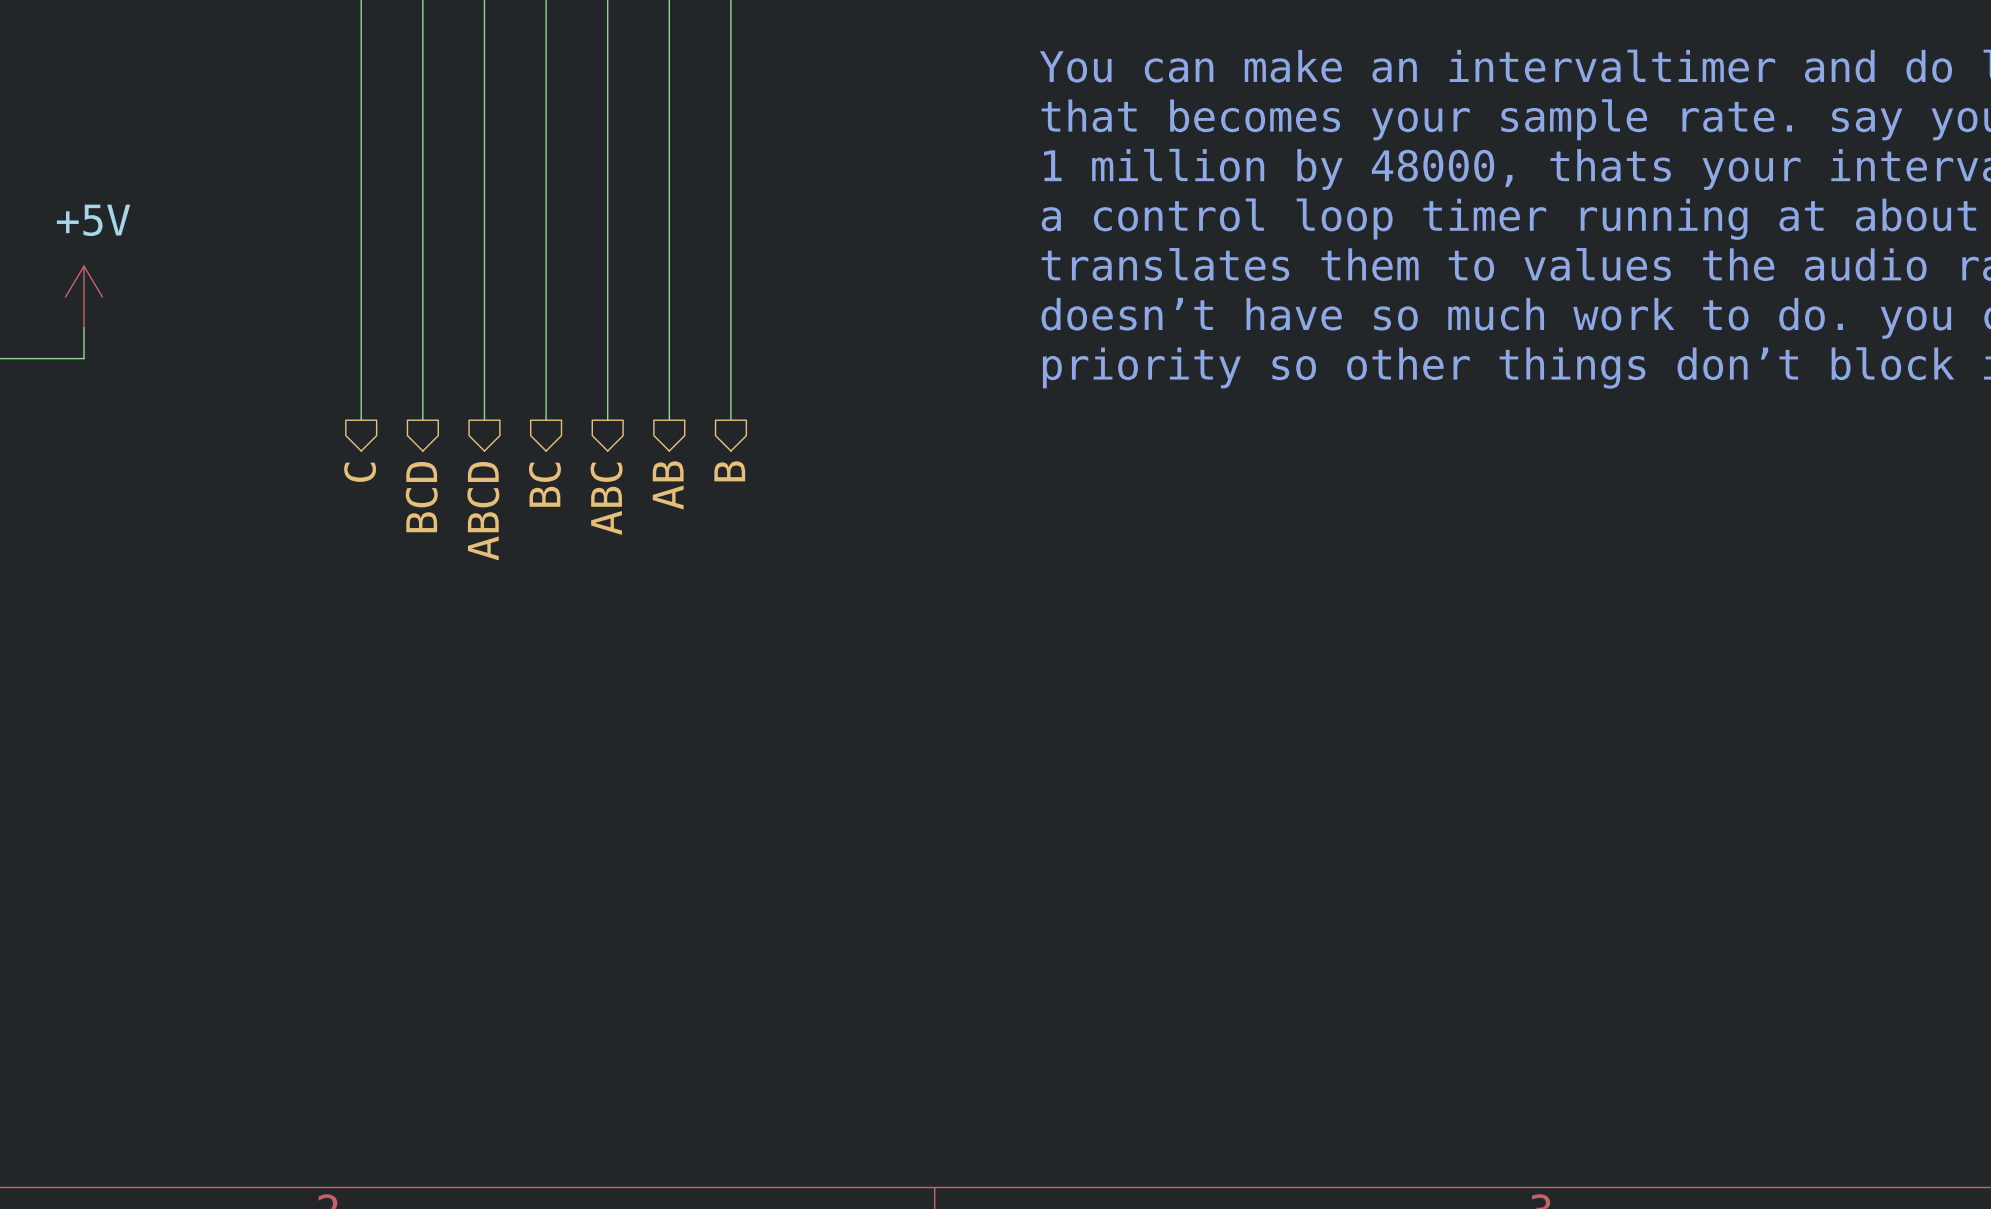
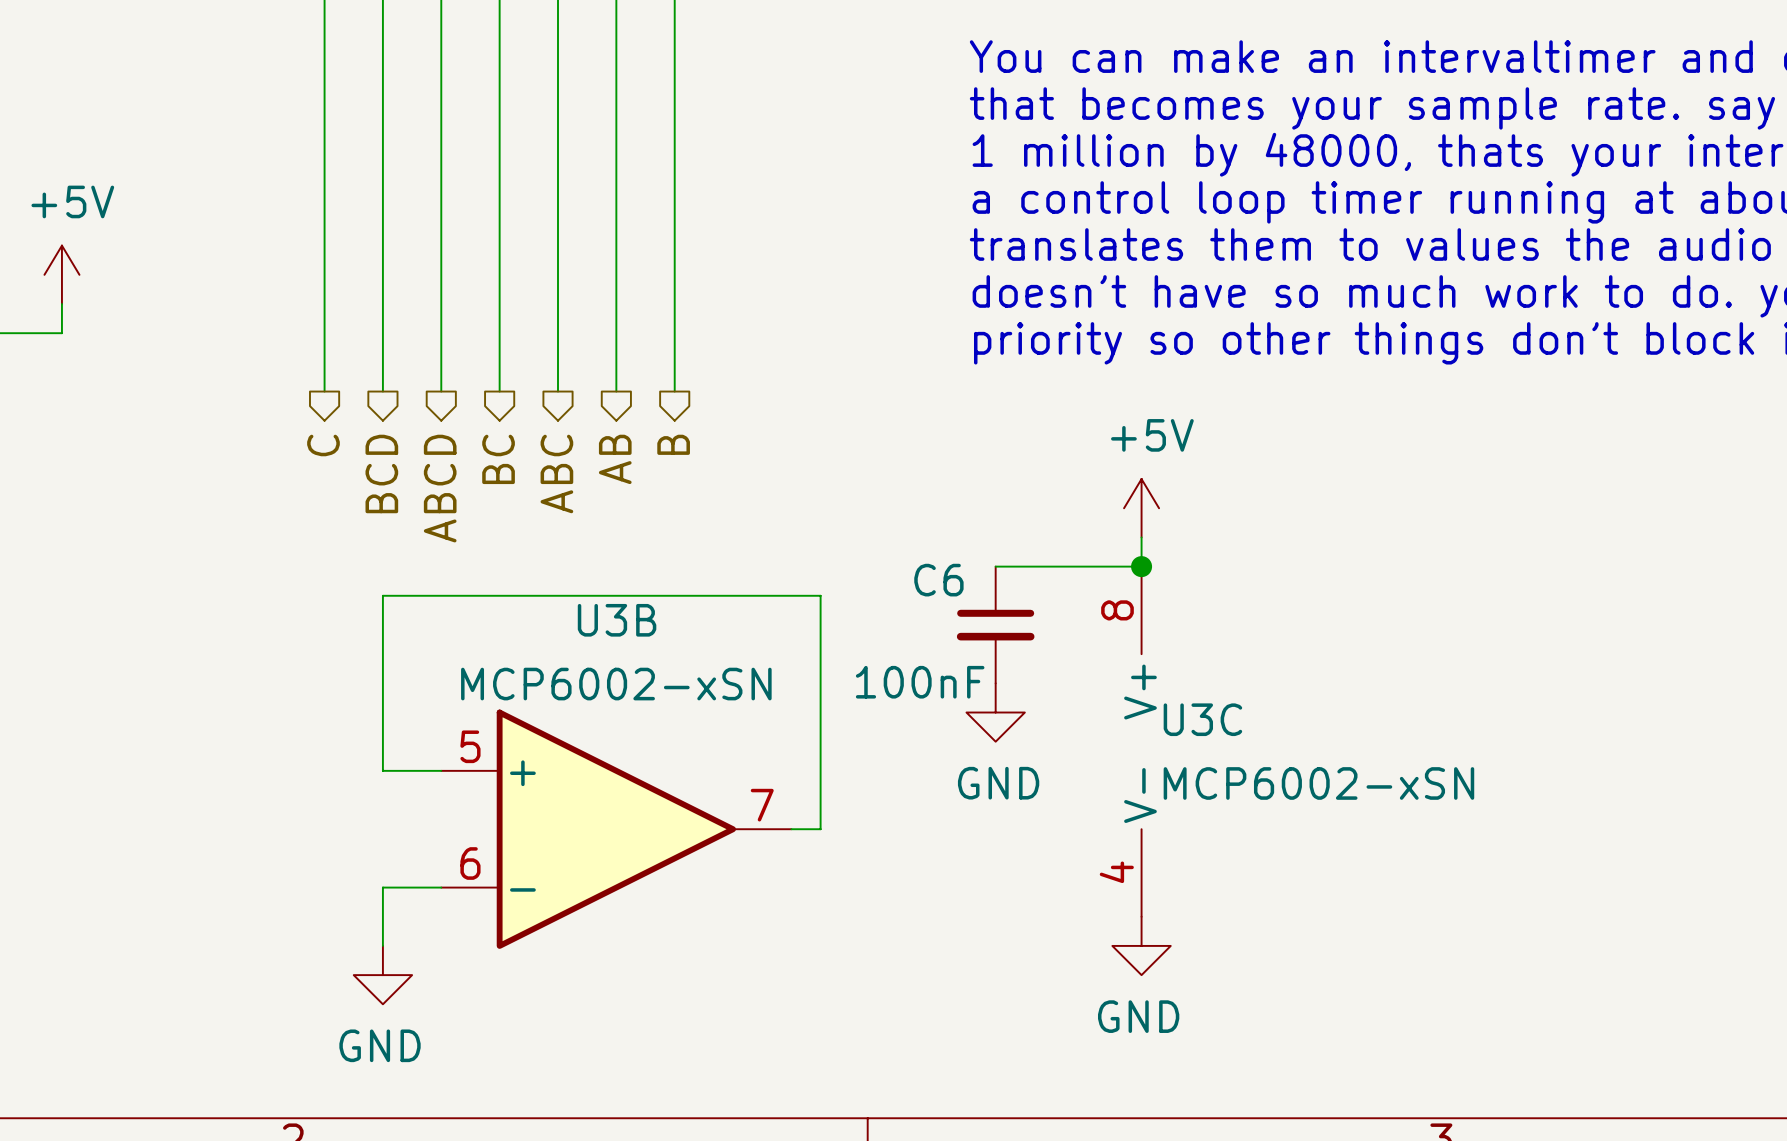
power symbol: none -> +5V (1141, 508)
wire: none -> (1141, 537) (1141, 566) (995, 566)
junction: none -> (1141, 566)
C6: none -> 100nF (995, 624)
power symbol: none -> GND (995, 712)
U3C: none -> MCP6002-xSN (1141, 741)
wire: none -> (441, 770) (382, 770) (382, 595) (820, 595) (820, 829) (791, 829)
U3B: none -> MCP6002-xSN (616, 829)
wire: none -> (441, 887) (382, 887) (382, 945)
power symbol: none -> GND (1141, 945)
power symbol: none -> GND (382, 975)

